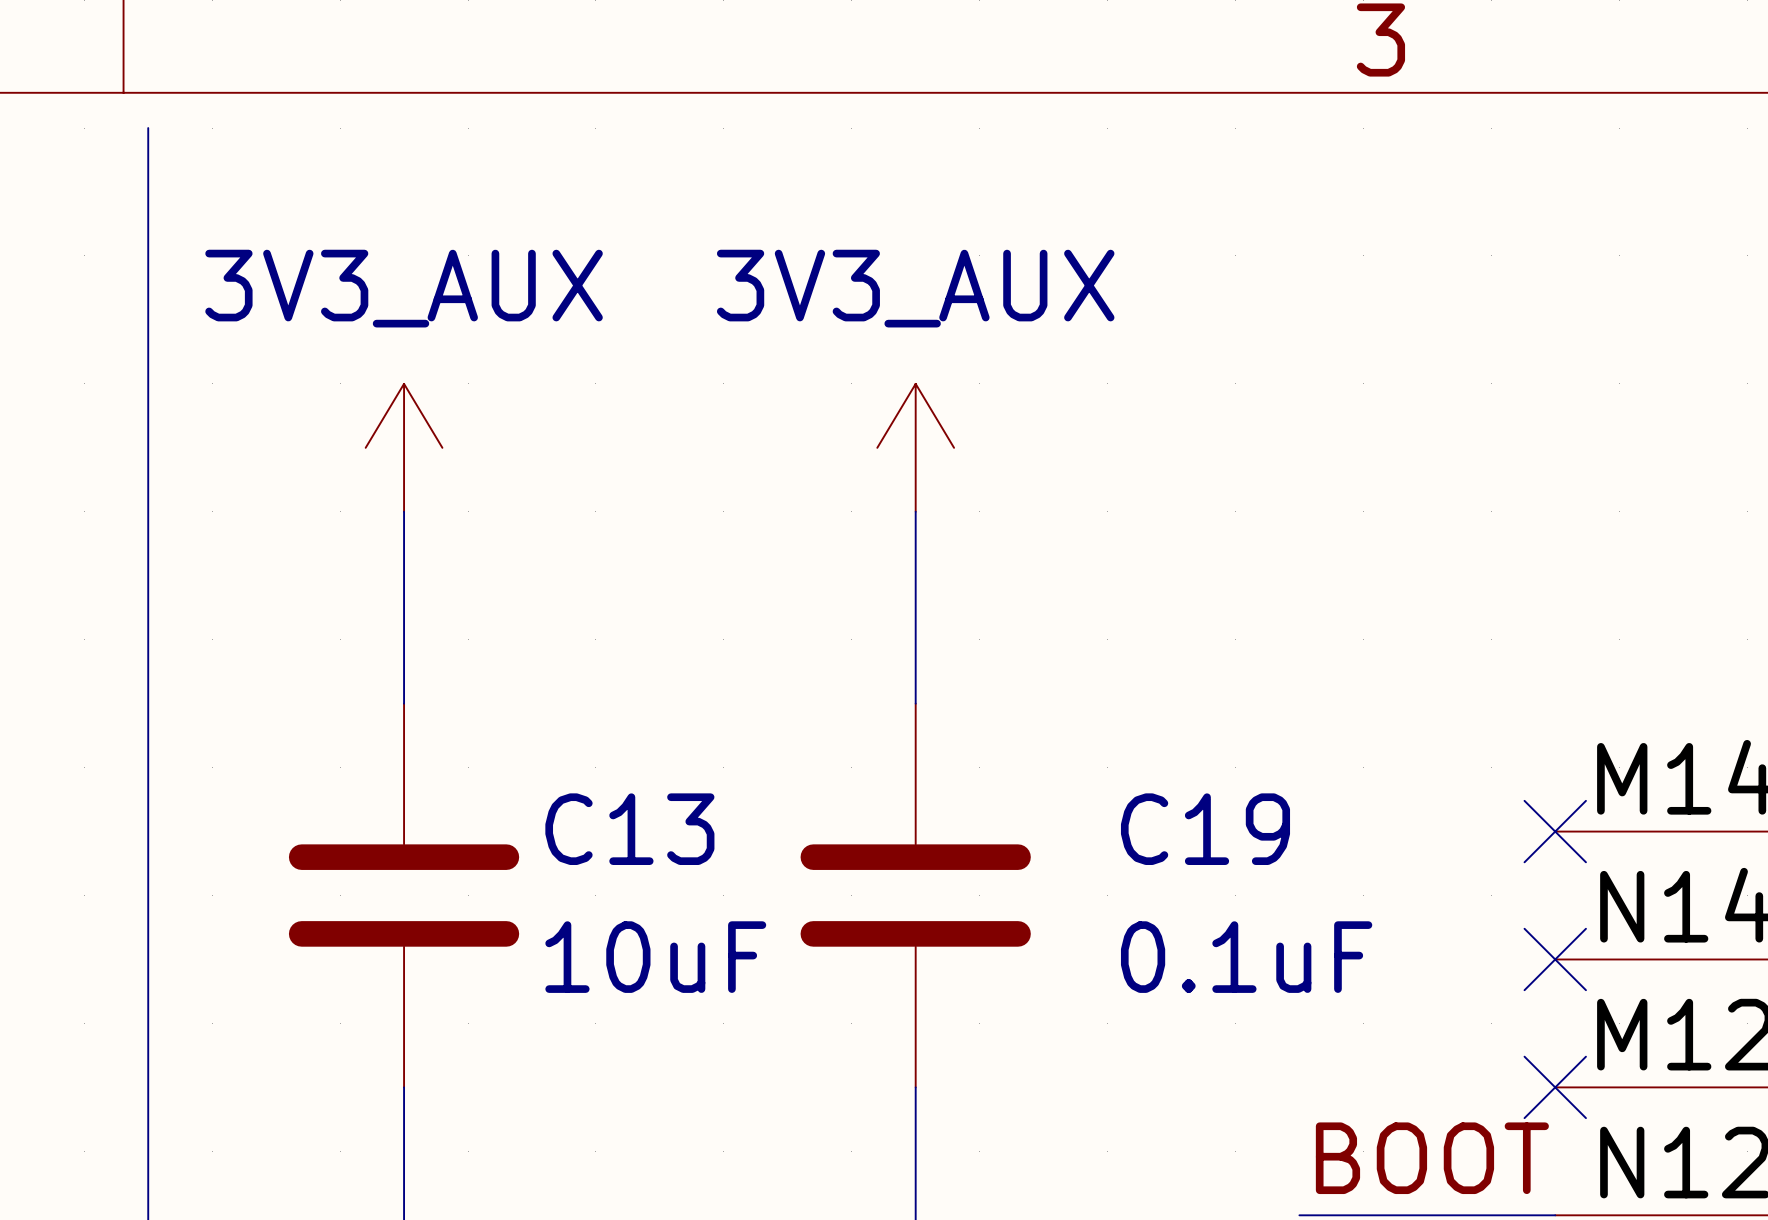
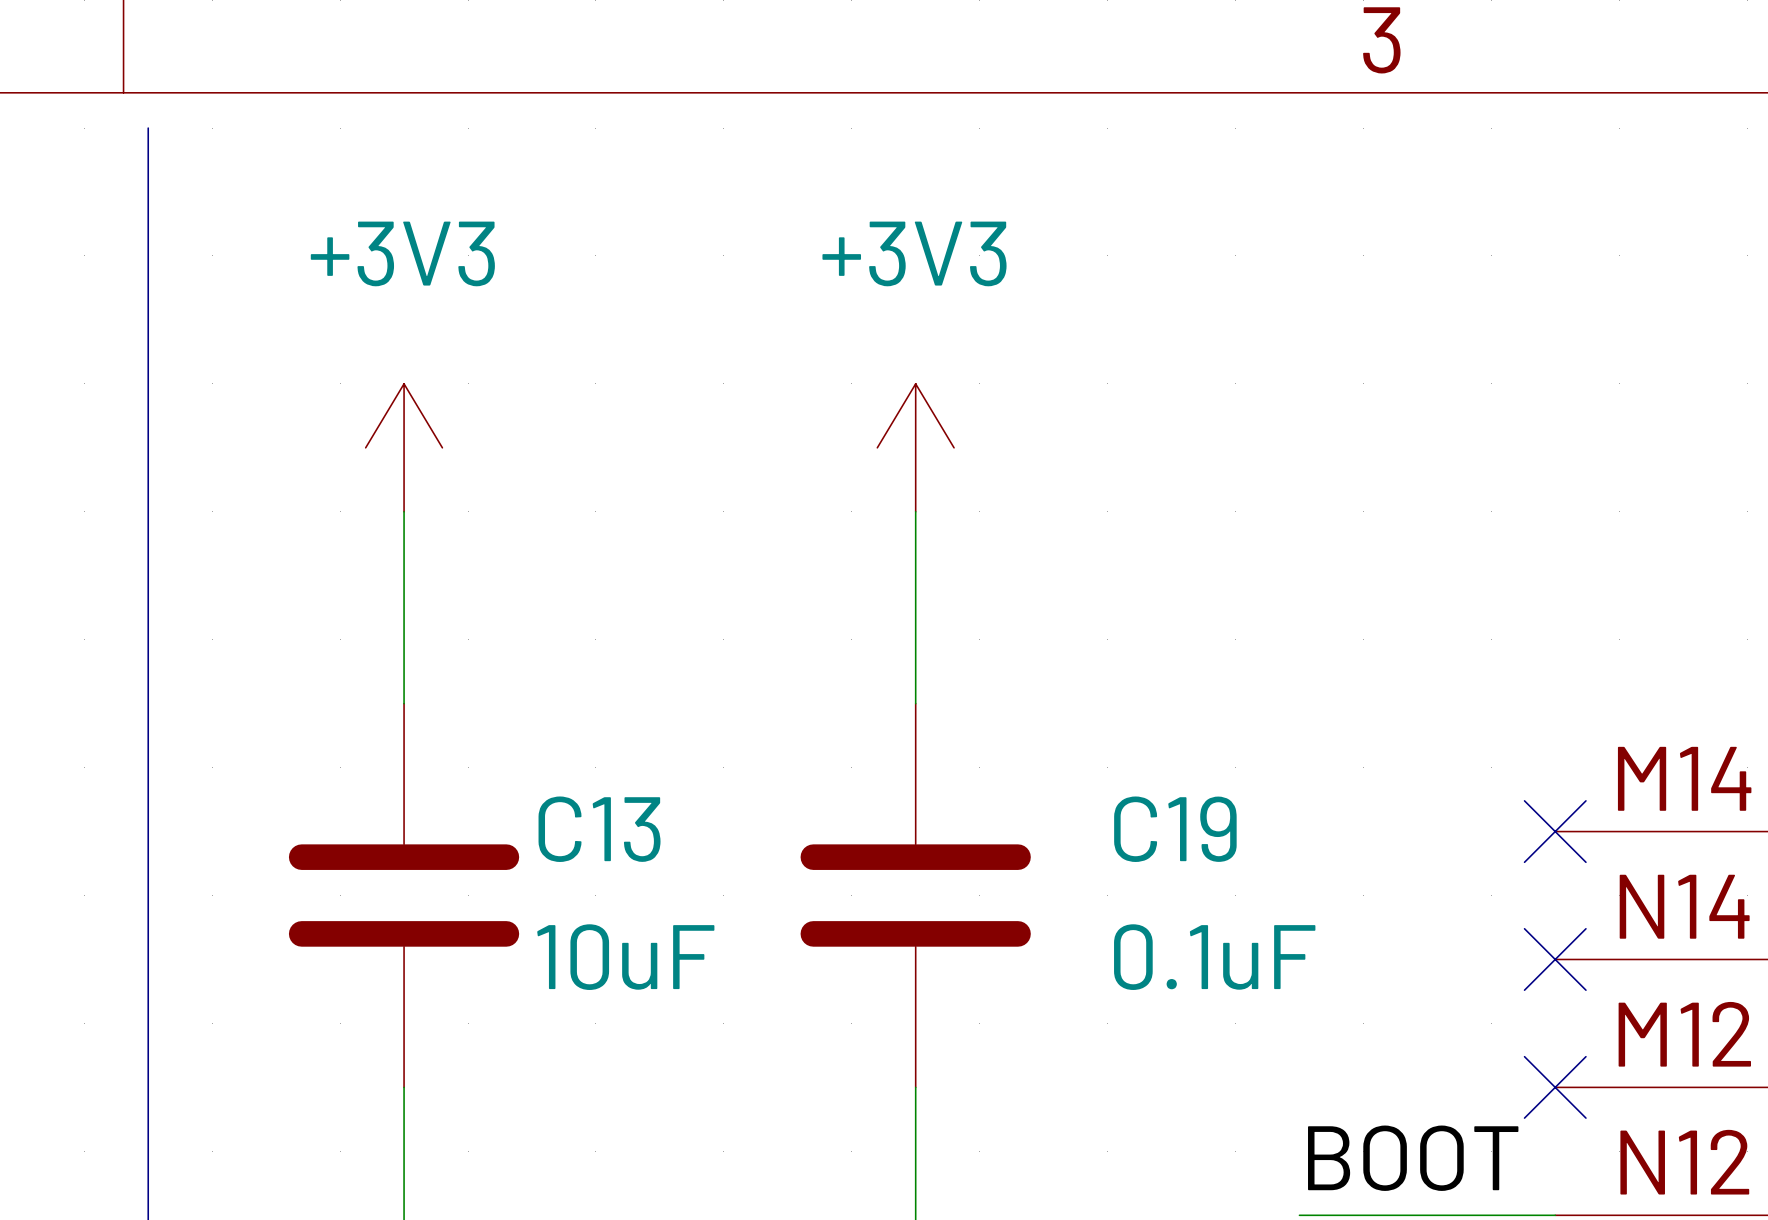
power symbol: 3V3_AUX (404, 447) -> +3V3 (404, 447)
power symbol: 3V3_AUX (915, 447) -> +3V3 (915, 447)

